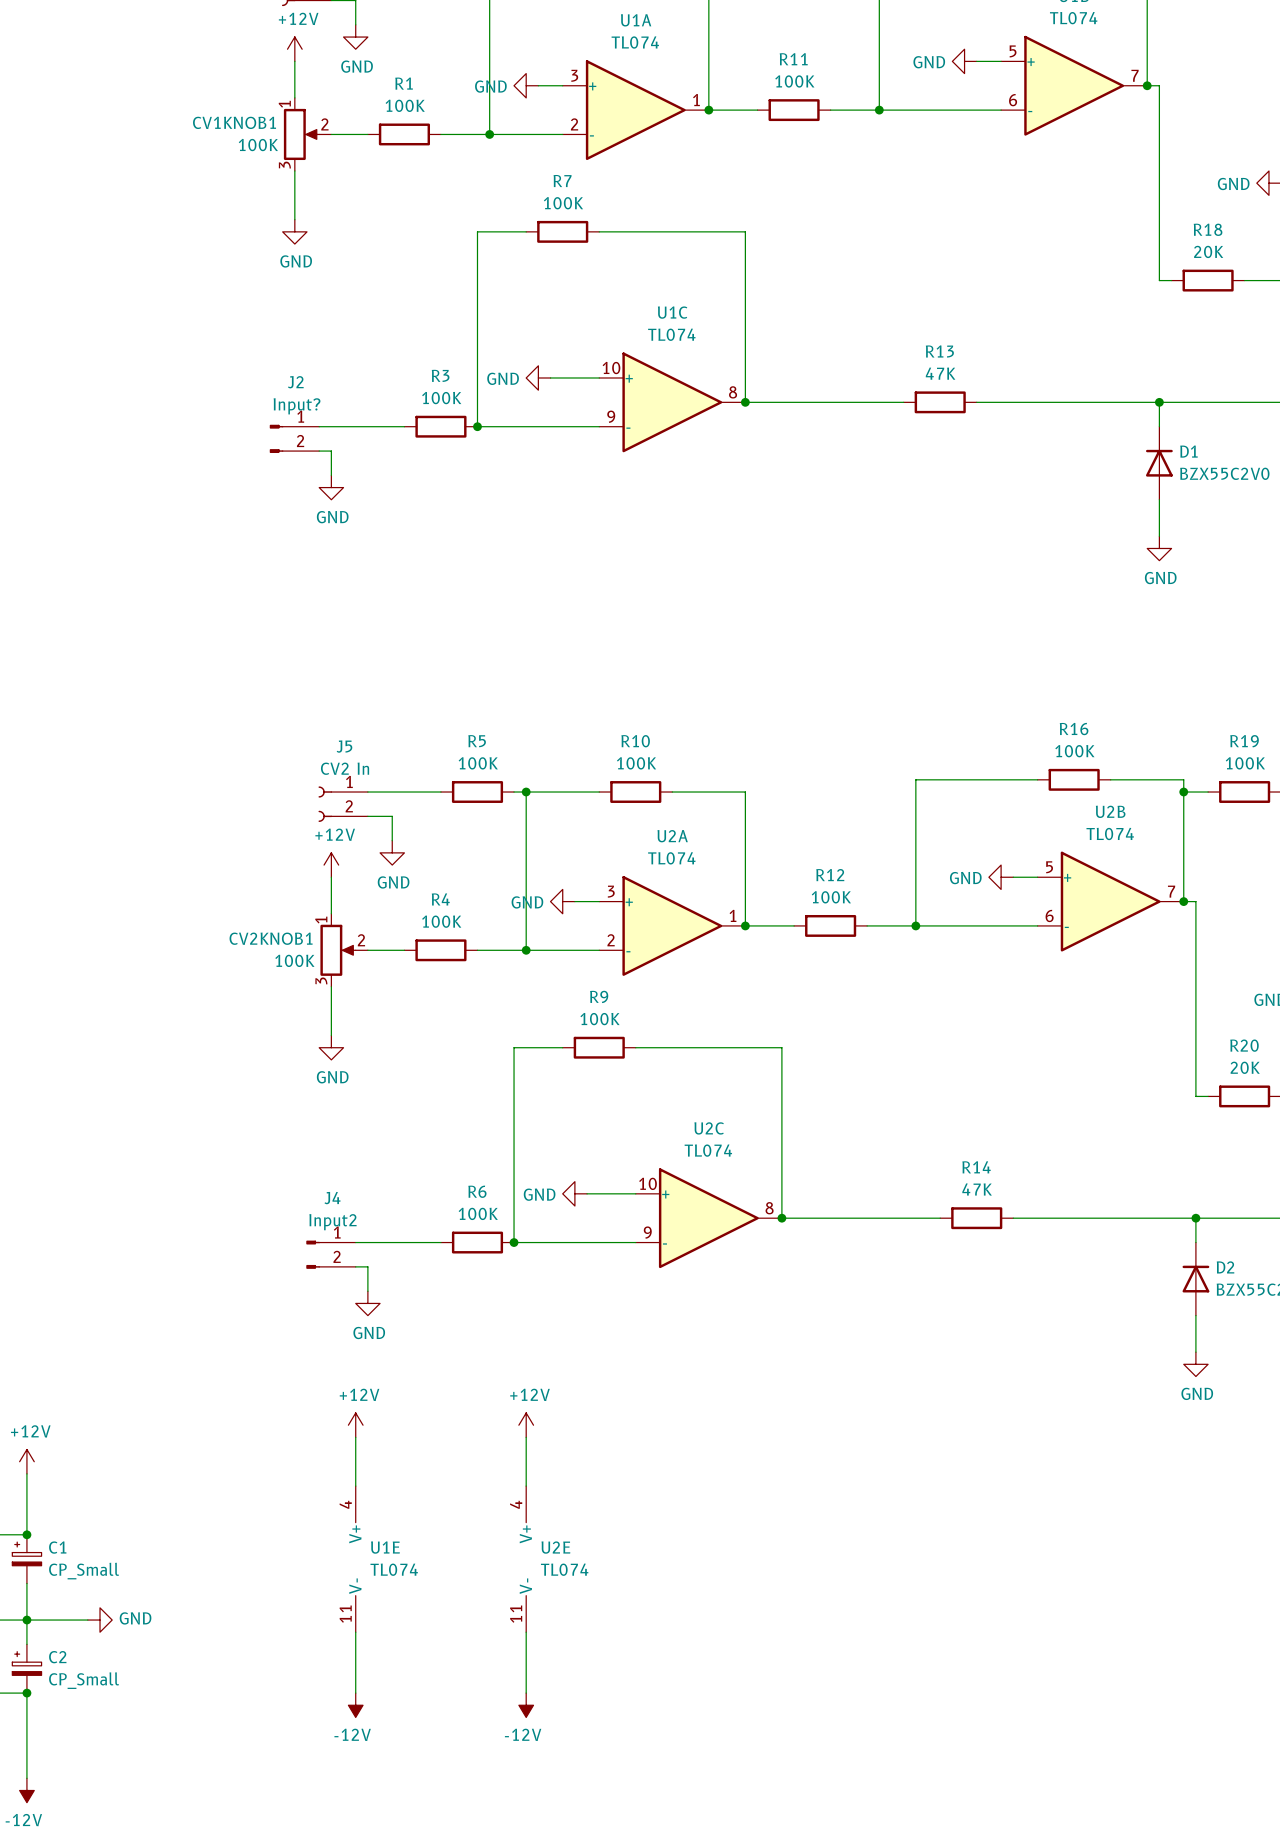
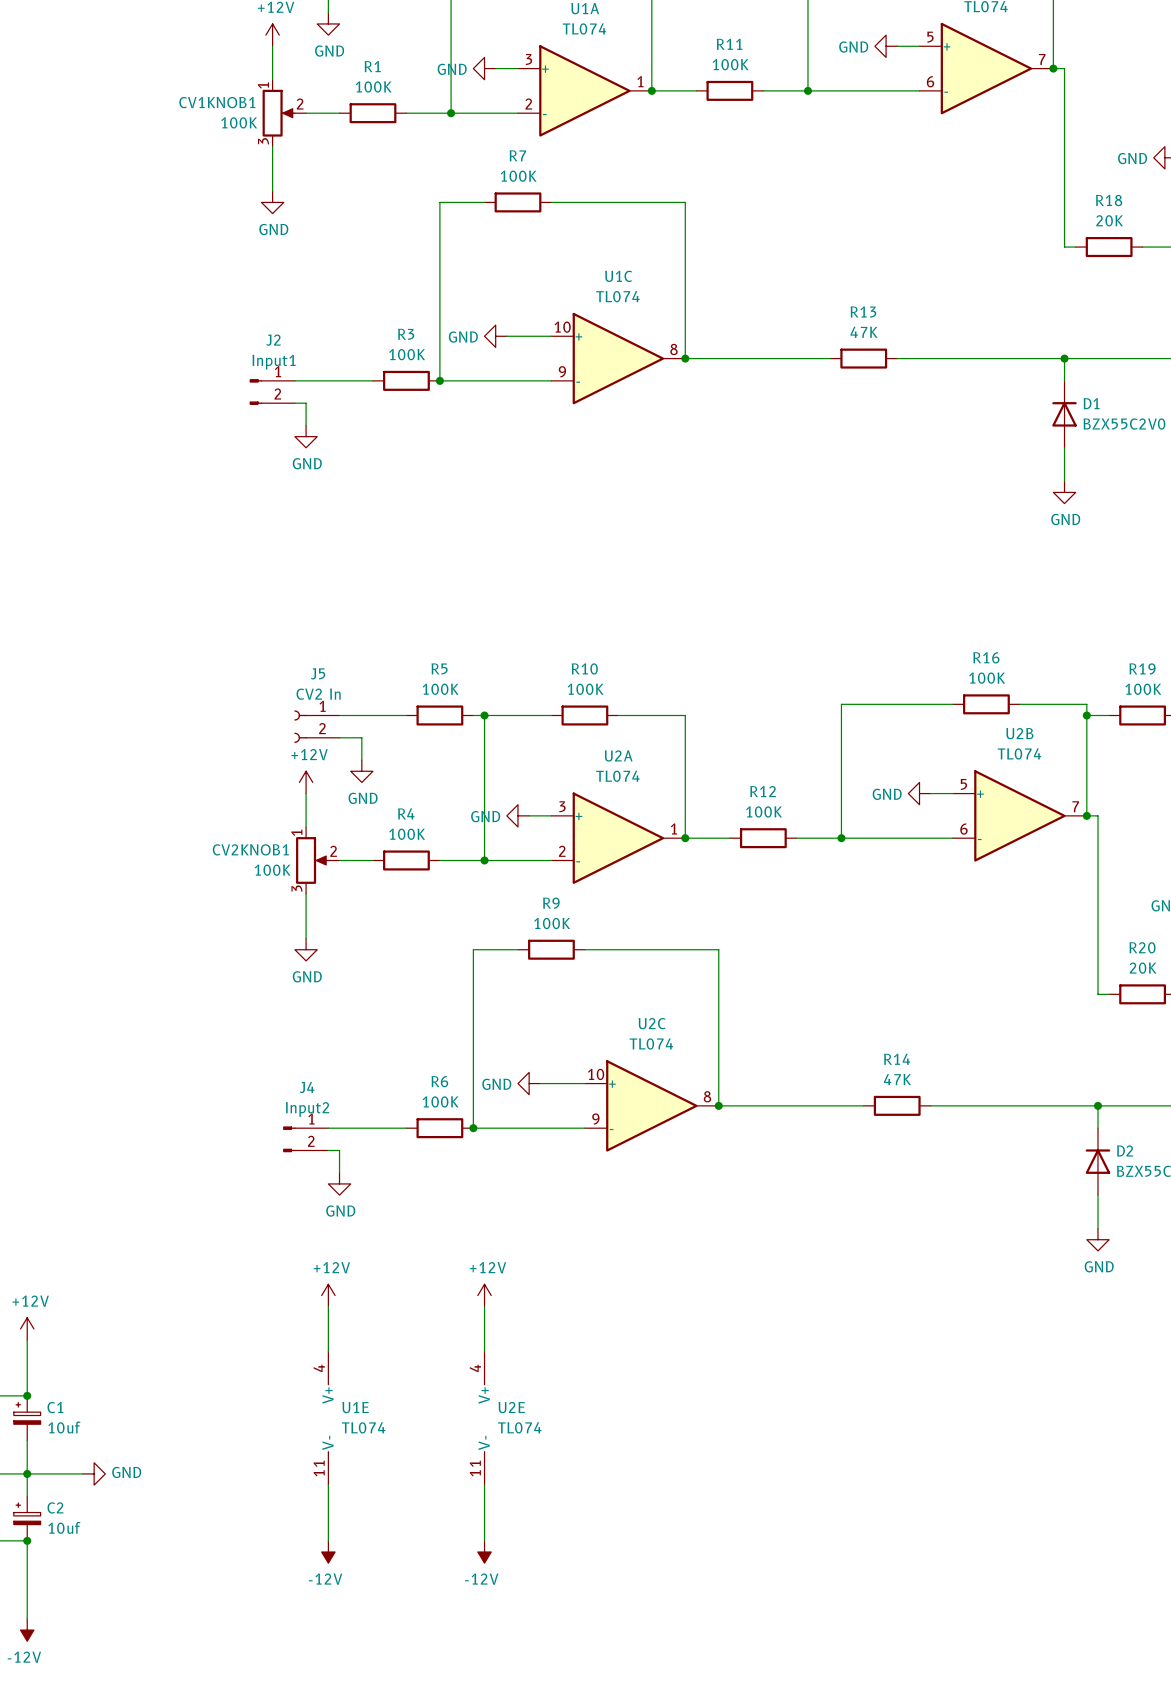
J2 value: Input? (297, 406) -> Input1 (274, 362)
C1 value: CP_Small (84, 1571) -> 10uf (64, 1427)
C2 value: CP_Small (84, 1680) -> 10uf (64, 1527)

